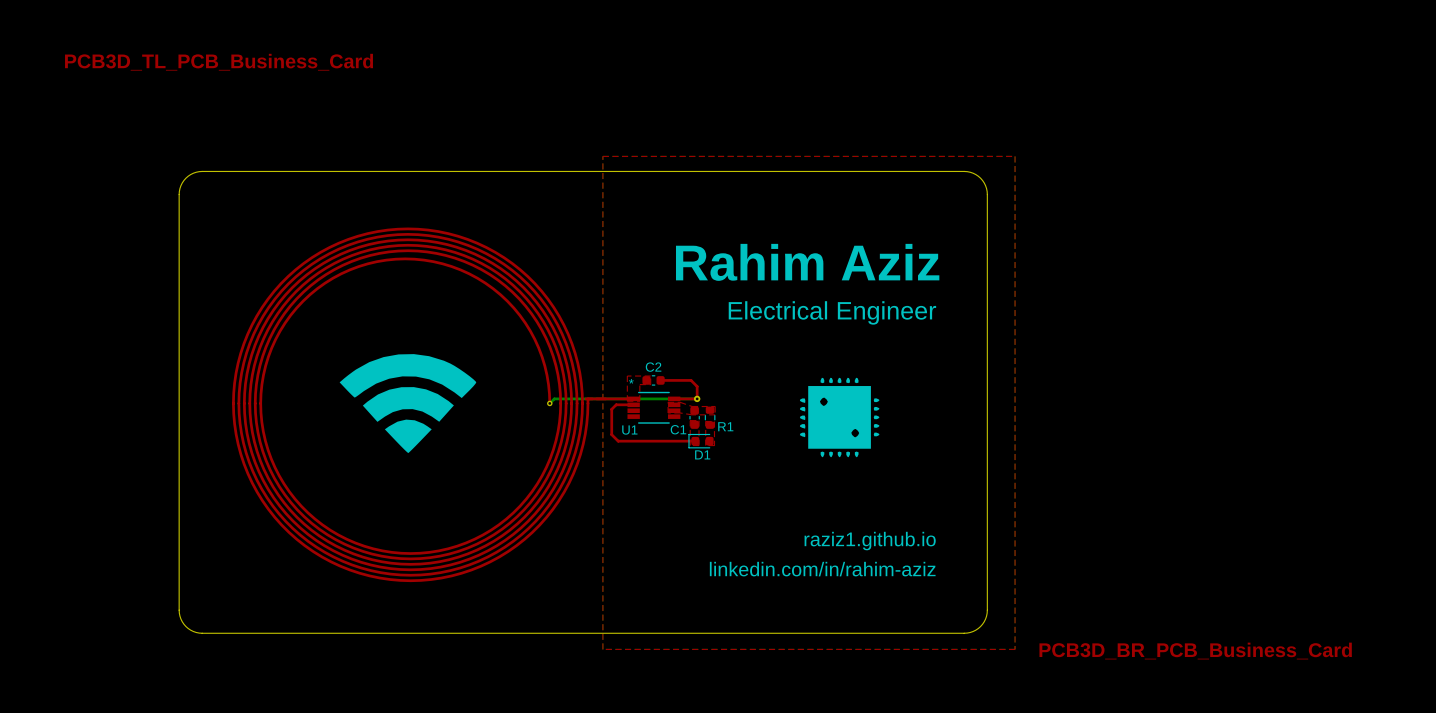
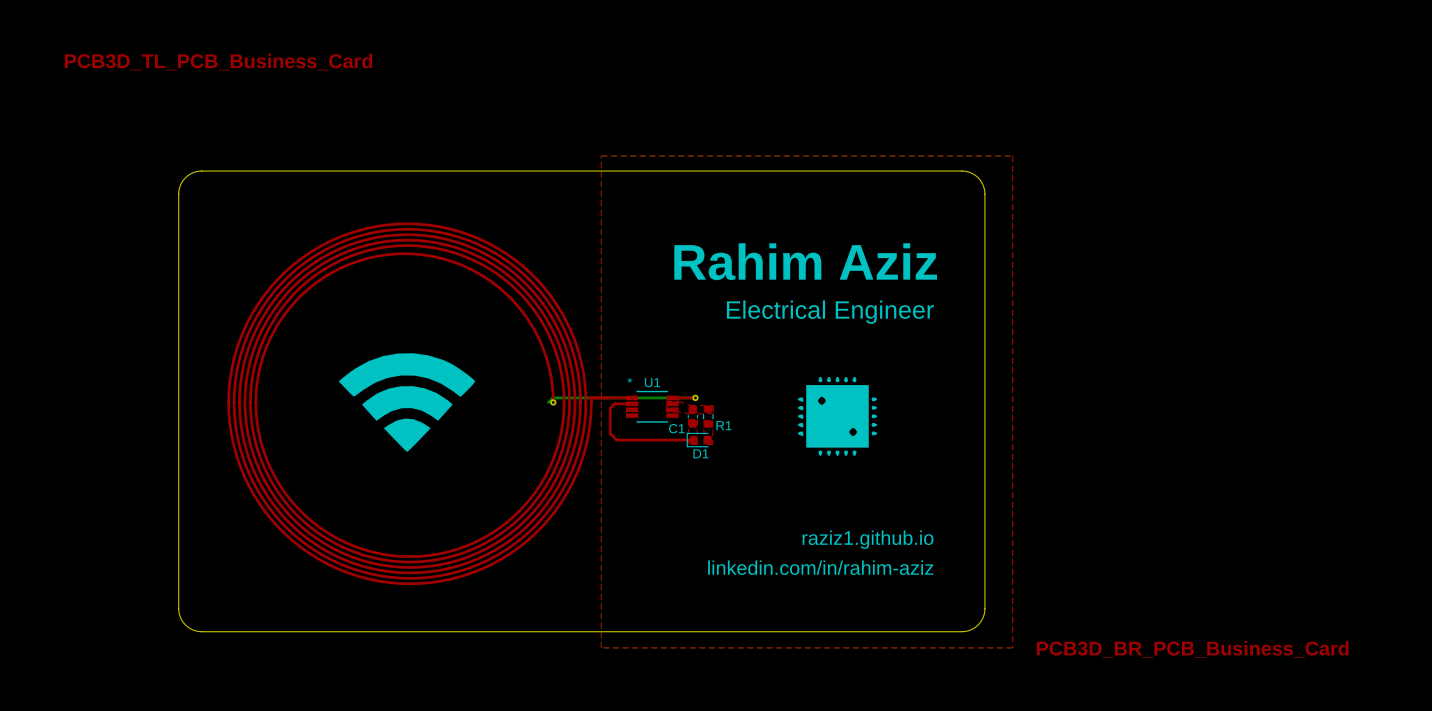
part footprint: [232, 227, 607, 583] -> [227, 222, 610, 586]
top zone outline: (627, 376) (650, 376) (650, 384) (639, 384) (639, 401) (627, 401) (627, 376) -> none
C2: (653, 380) -> none
top track: (660, 380) (691, 380) (697, 386) (697, 398) -> none
U1 name position: U1 (629, 430) -> U1 (652, 382)

